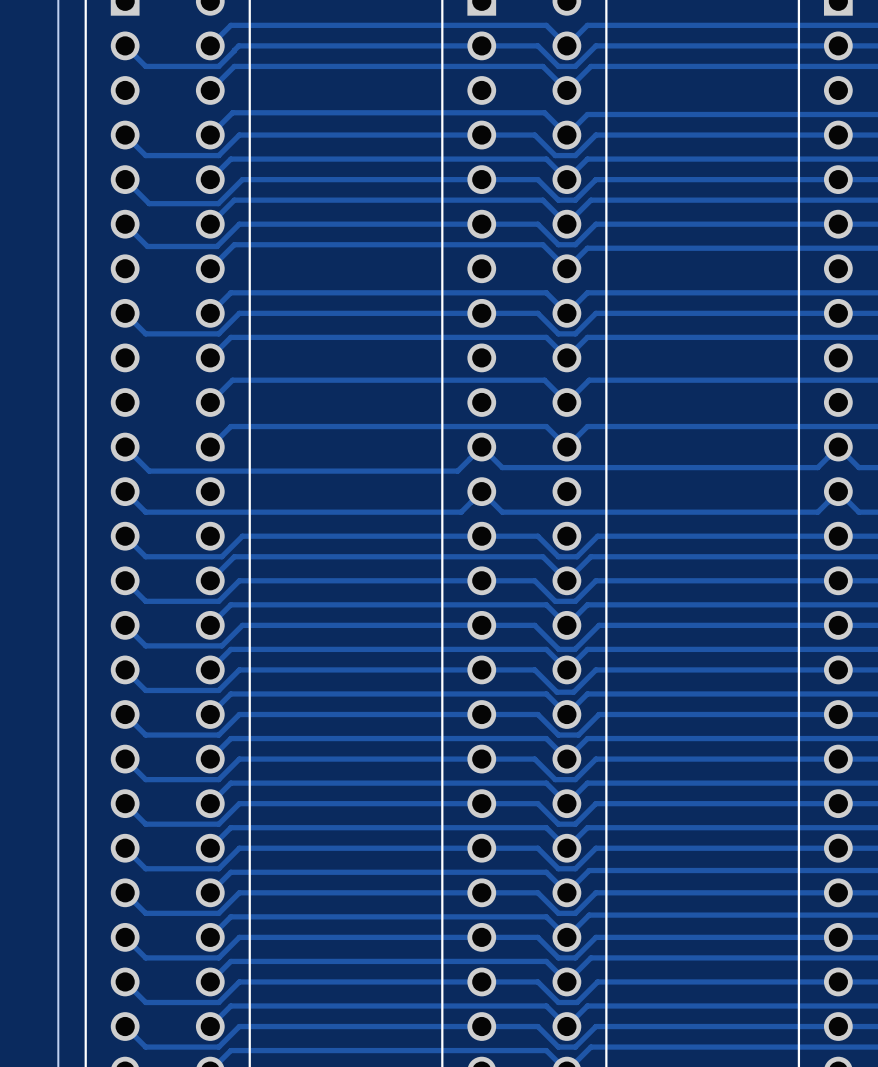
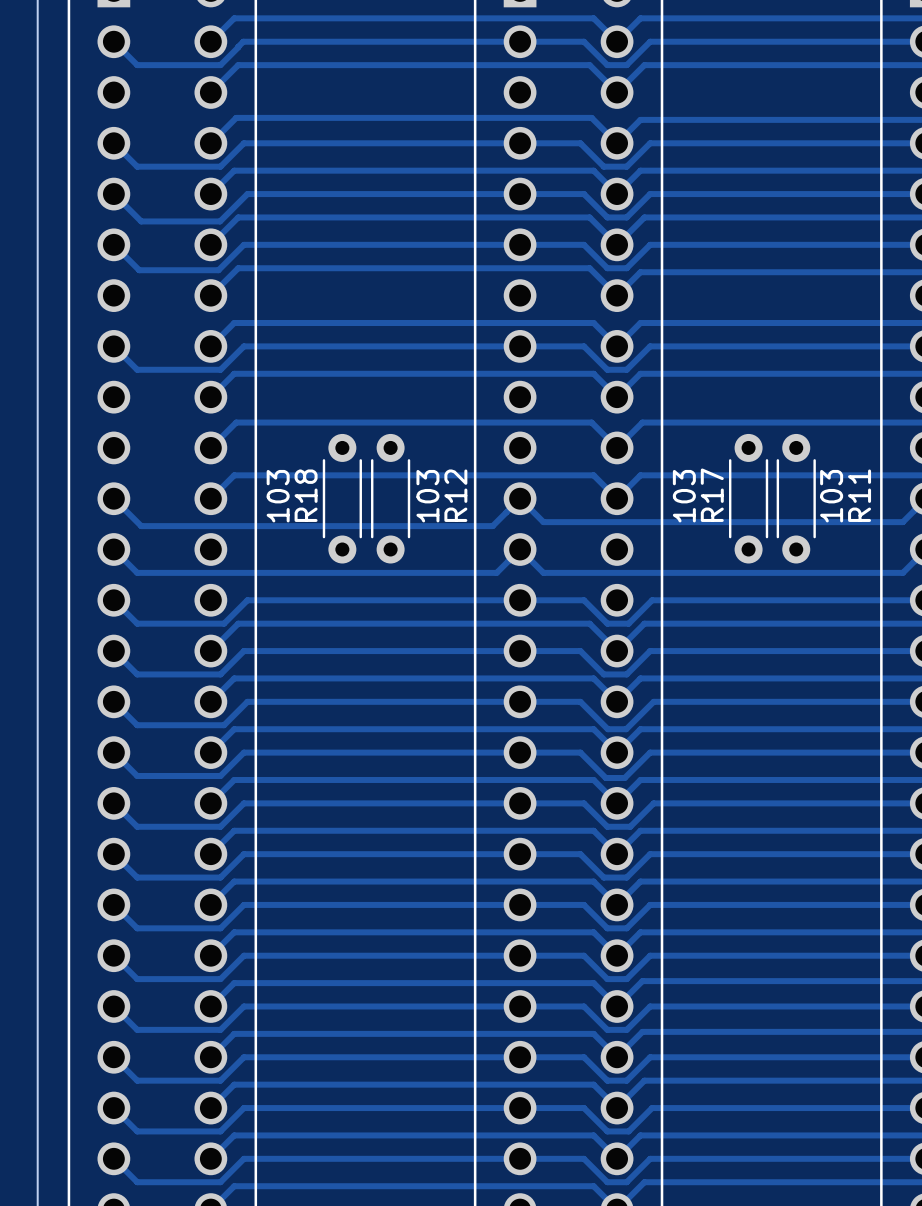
R18: none -> 103 (342, 498)
R12: none -> 103 (390, 498)
R17: none -> 103 (748, 498)
R11: none -> 103 (796, 498)

